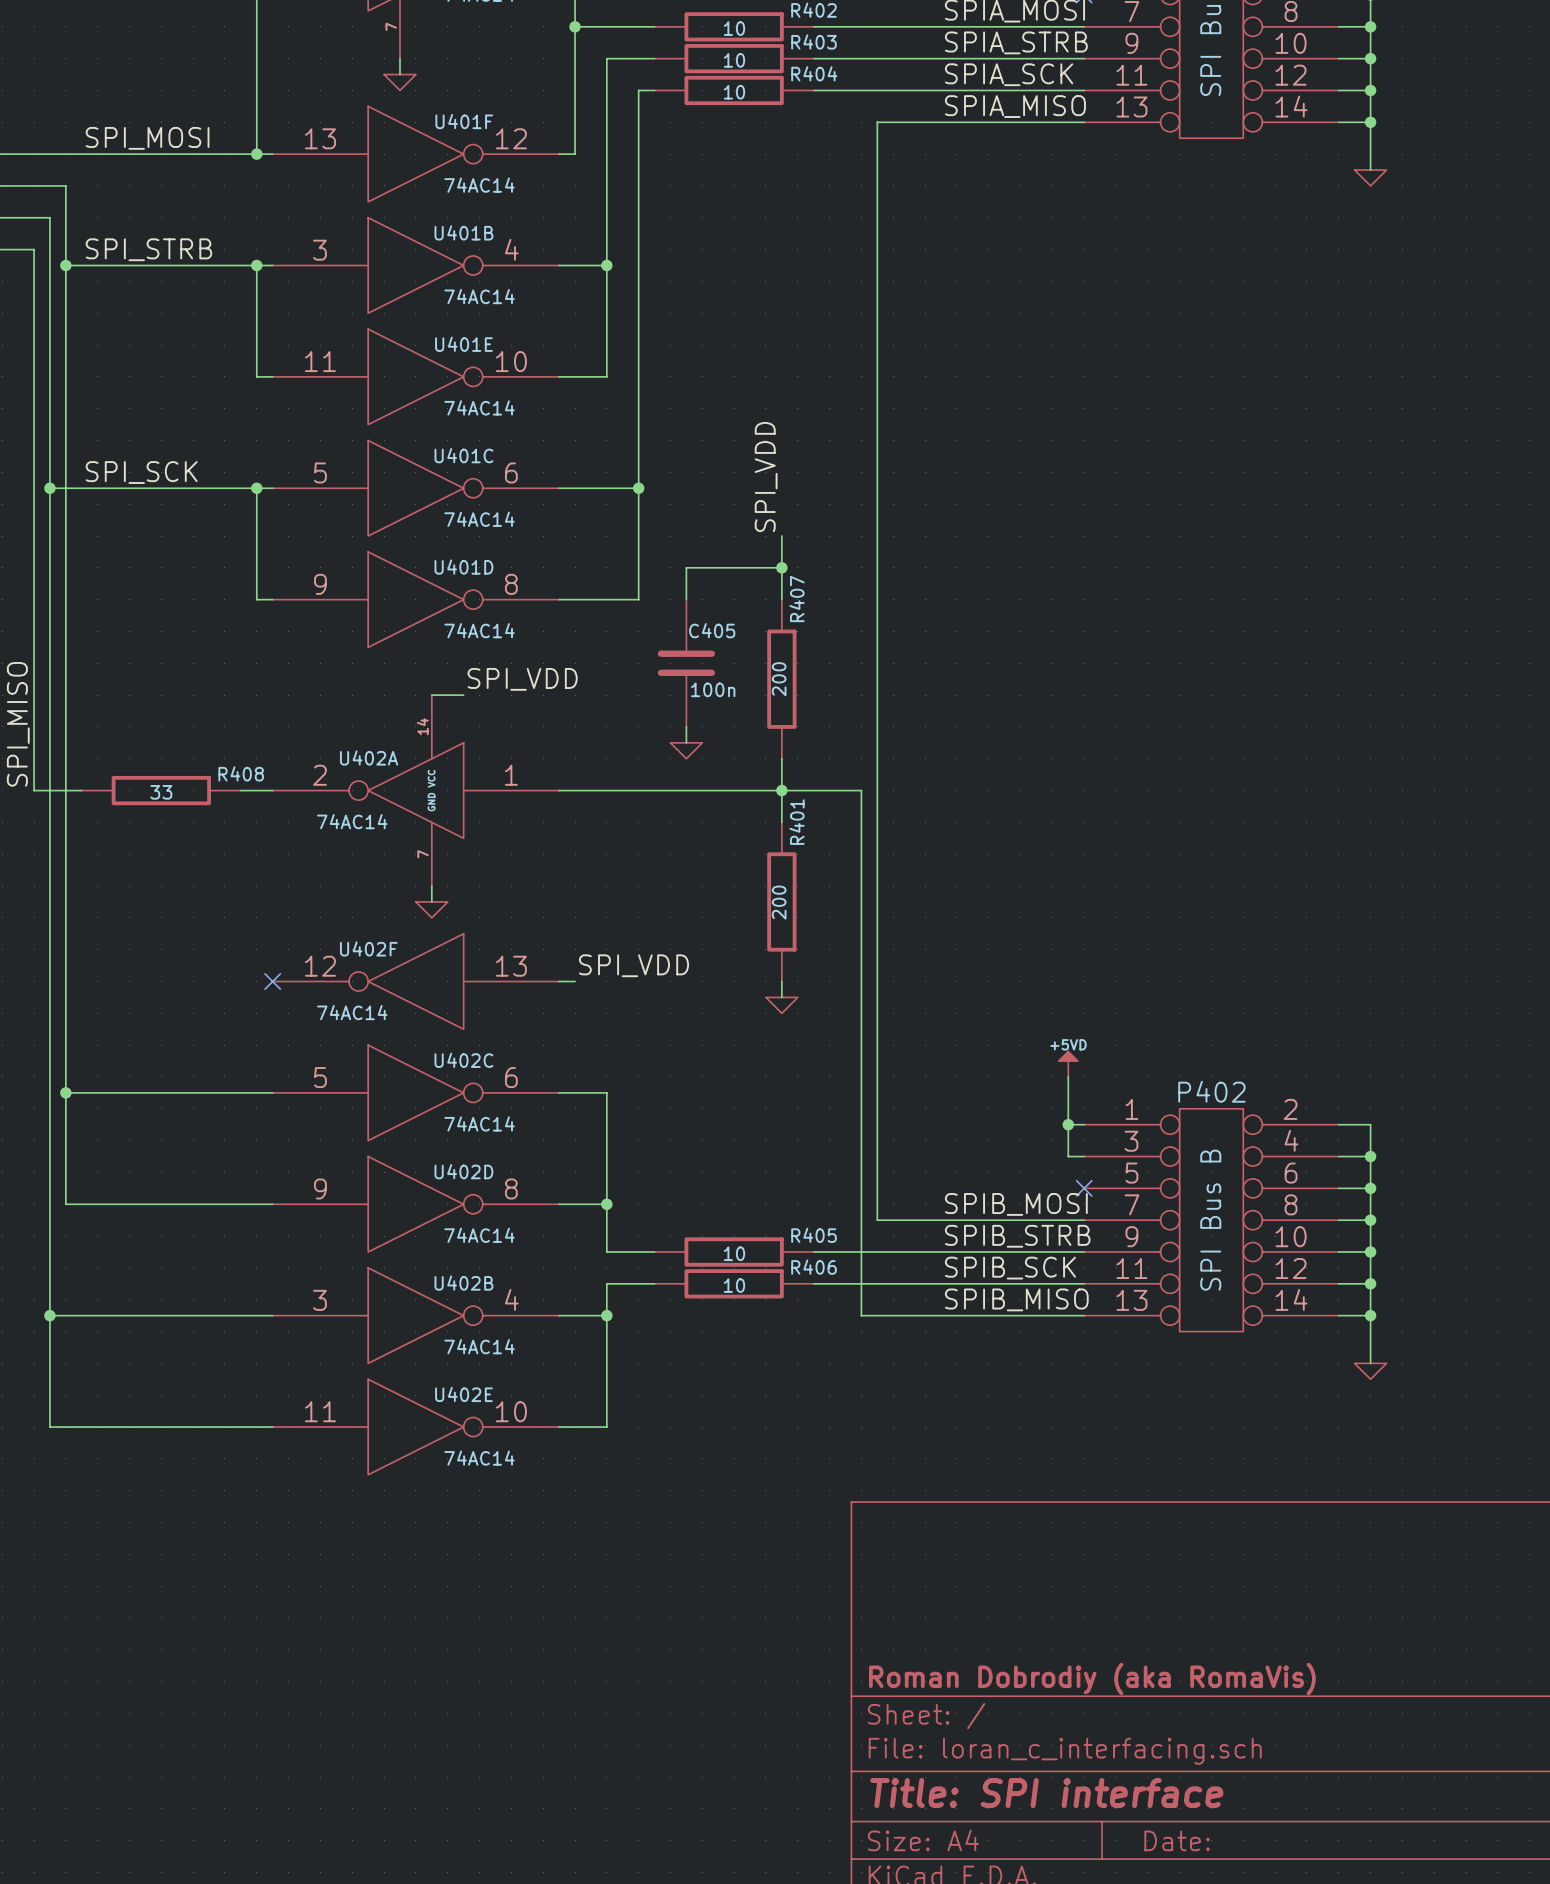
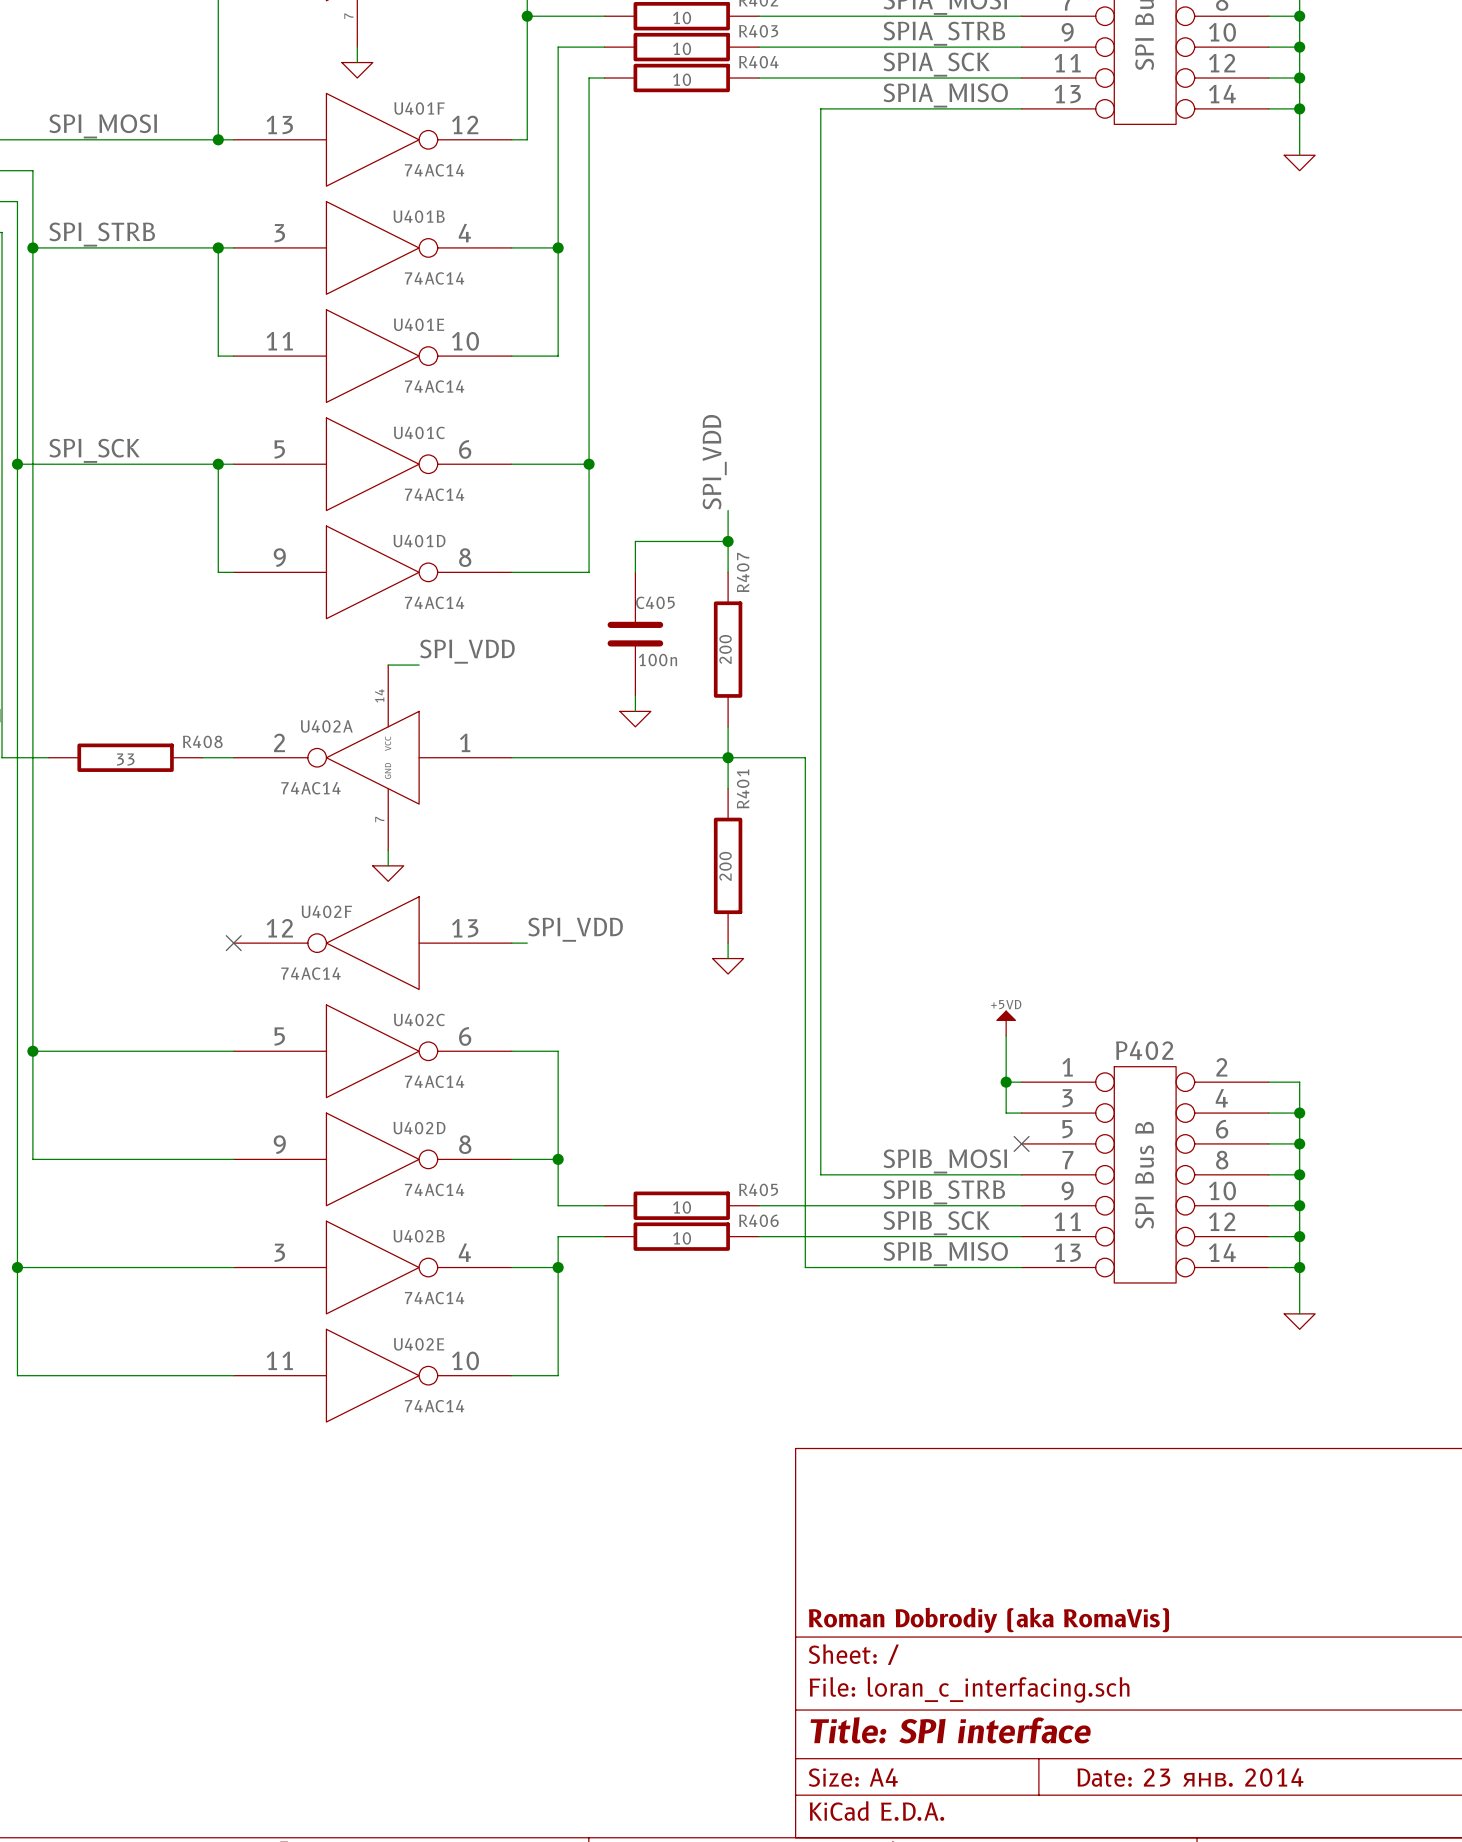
title block: Date: (1177, 1840) -> Date: 23 янв. 2014 (1190, 1777)

